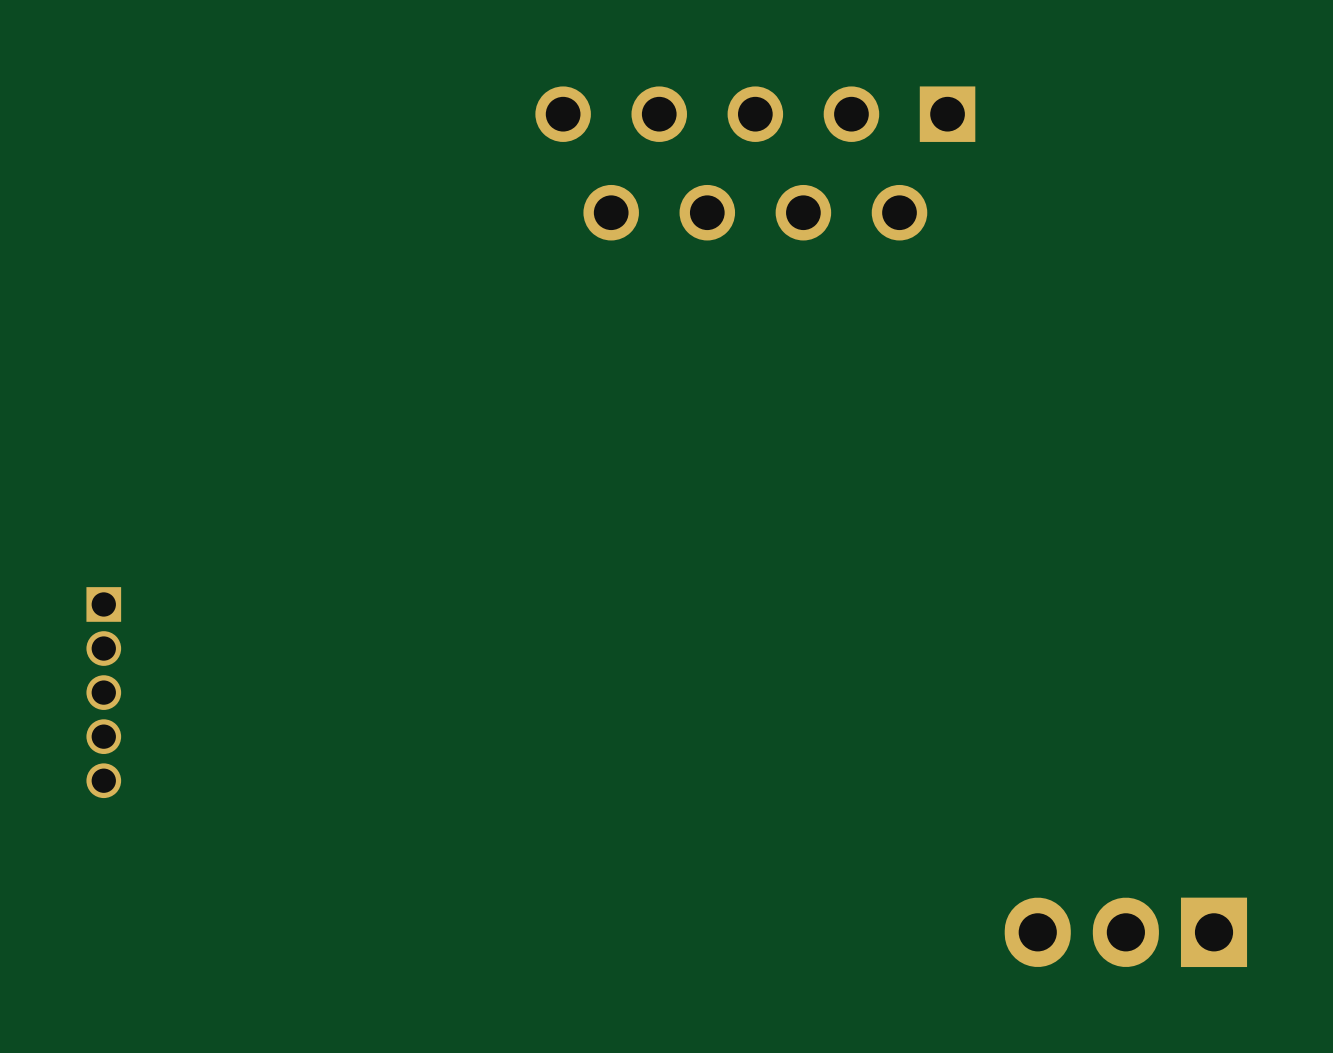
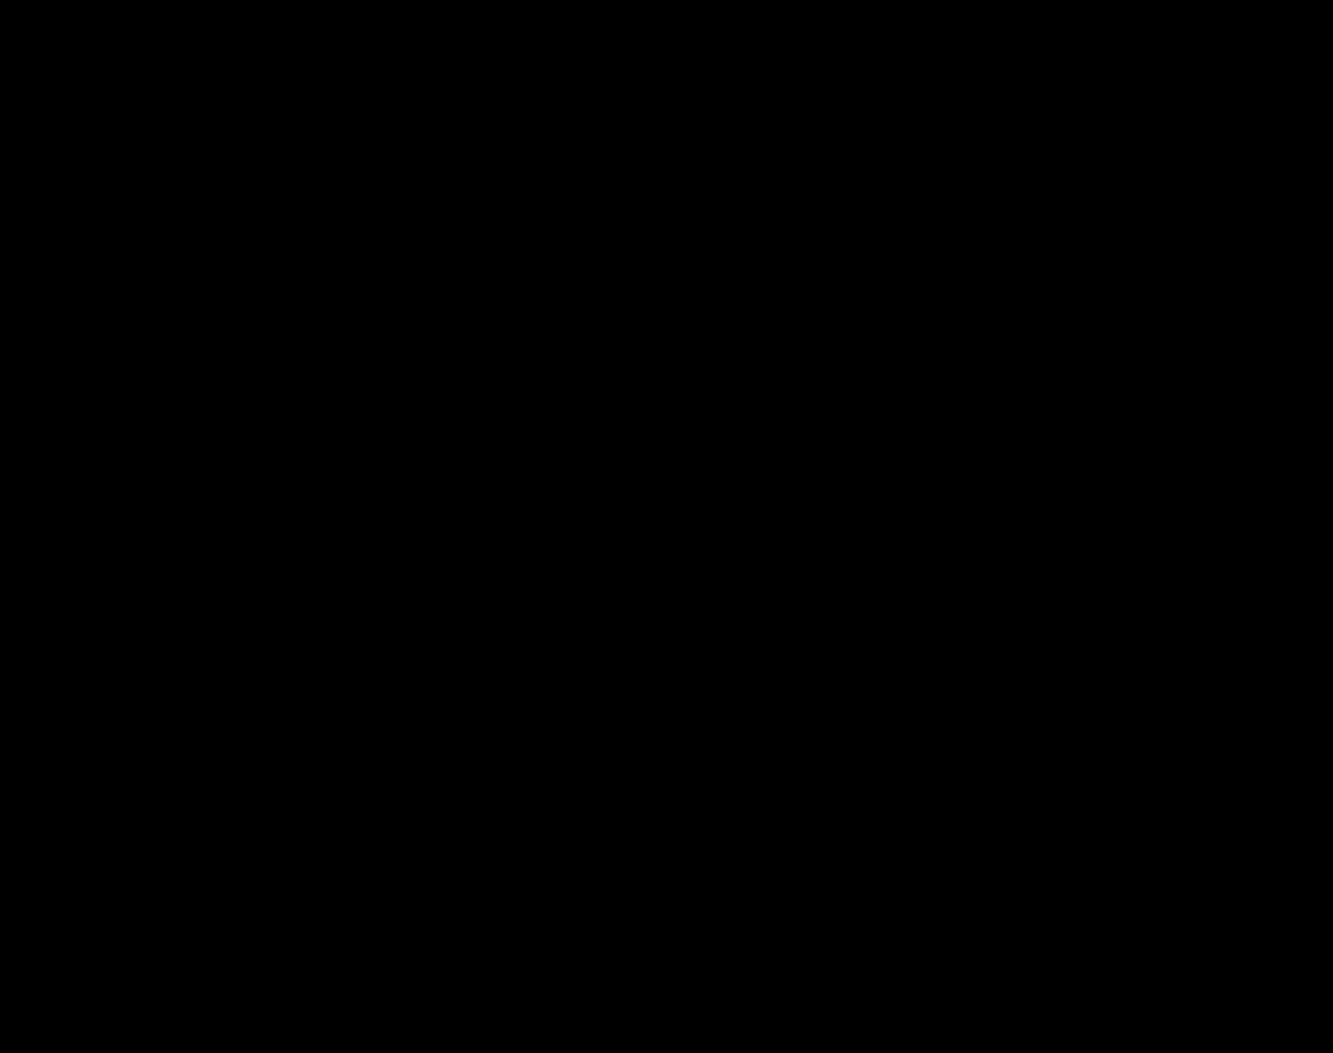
part: (755, 163) -> none
part: (103, 692) -> none
part: (1125, 932) -> none

